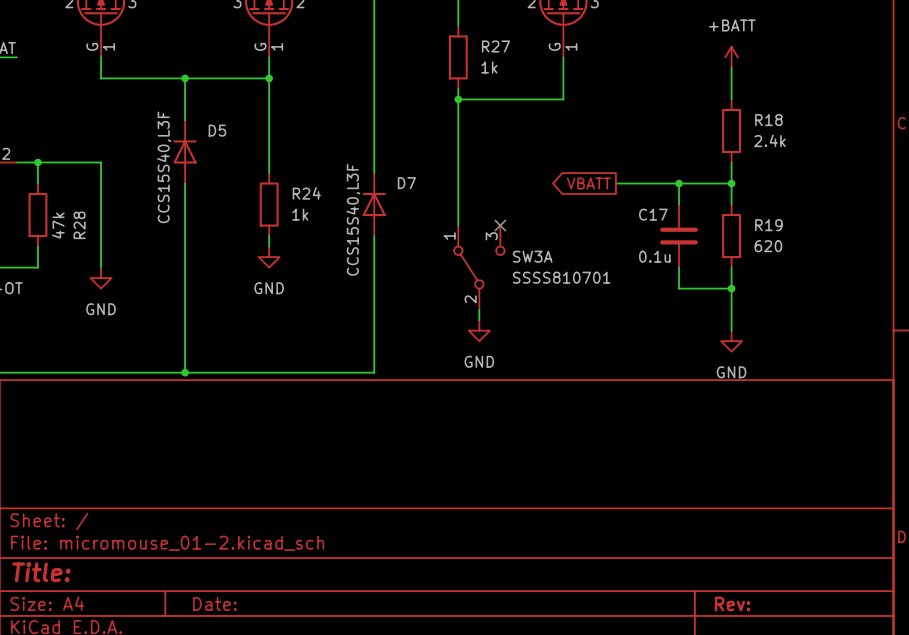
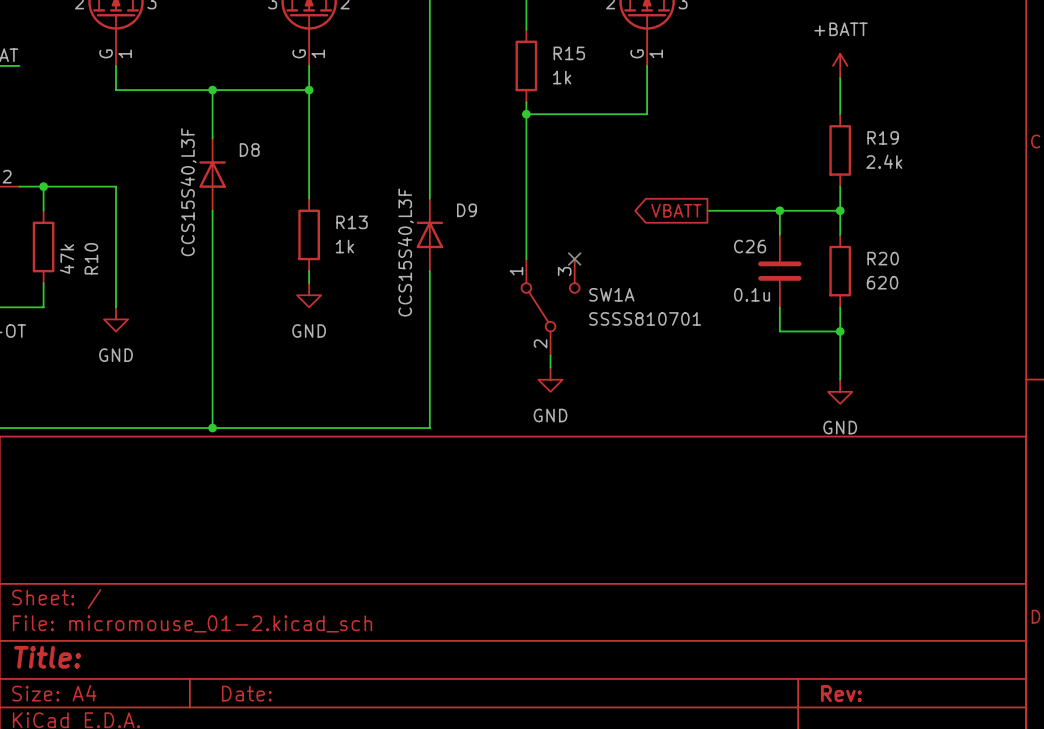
R27 name: R27 (495, 46) -> R15 (569, 53)
R18 name: R18 (768, 120) -> R19 (883, 137)
D5 name: D5 (217, 130) -> D8 (249, 149)
D7 name: D7 (406, 183) -> D9 (467, 210)
R24 name: R24 (306, 193) -> R13 (352, 222)
C17 name: C17 (653, 214) -> C26 (750, 246)
R28 name: R28 (79, 225) -> R10 (91, 258)
R19 name: R19 (768, 225) -> R20 (883, 258)
SW3A name: SW3A (532, 256) -> SW1A (611, 294)

